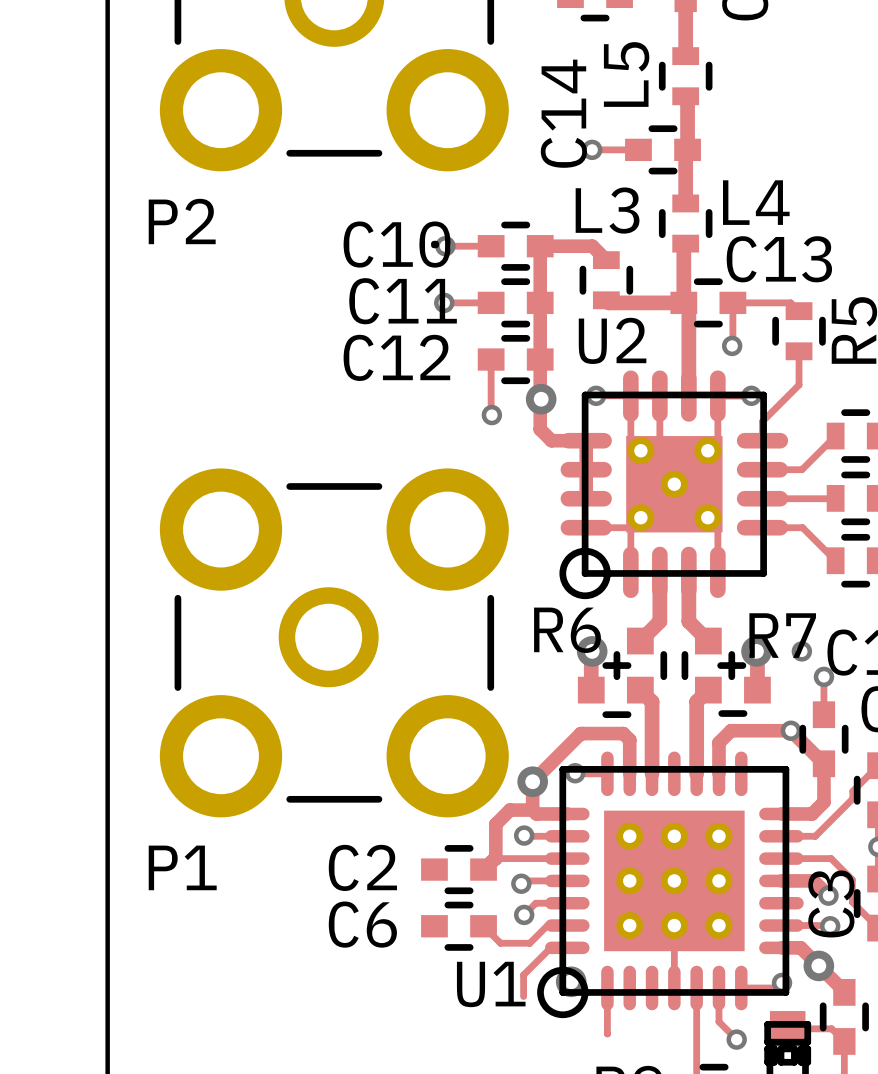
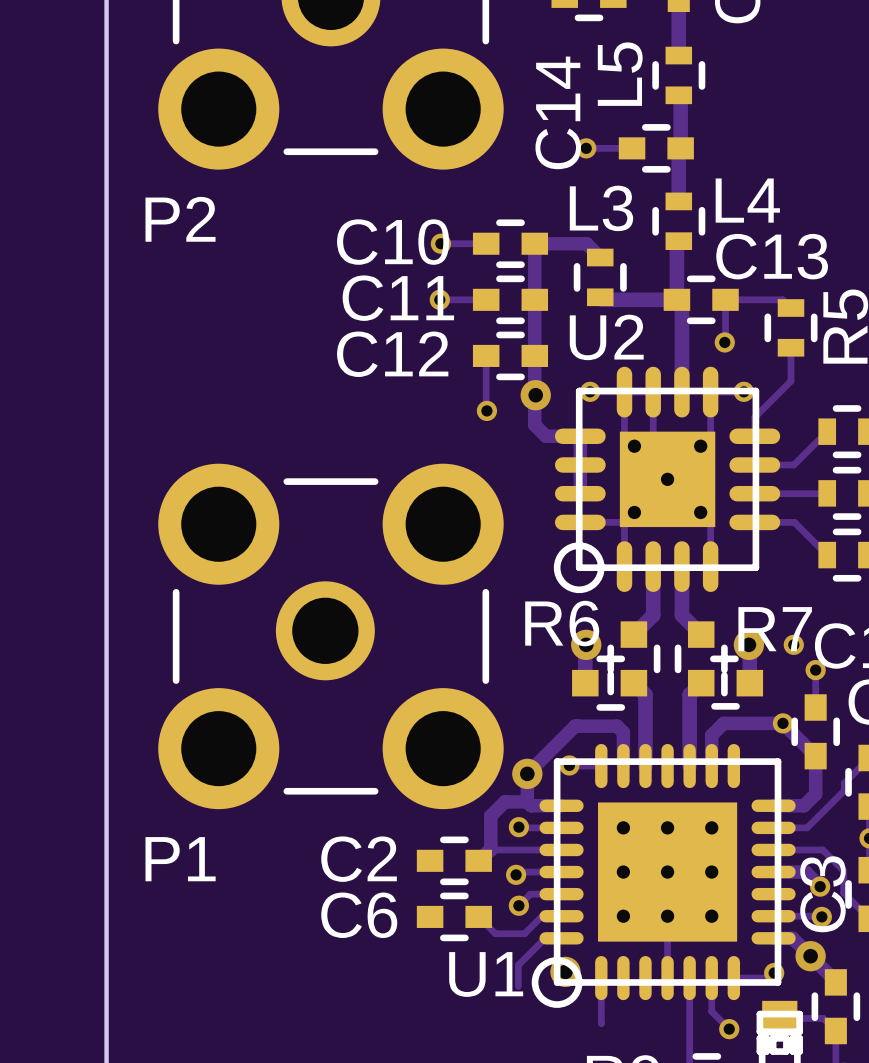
R6 footprint: [577, 627, 668, 719] -> [572, 621, 661, 711]
R7 footprint: [681, 627, 771, 717] -> [674, 621, 764, 710]

